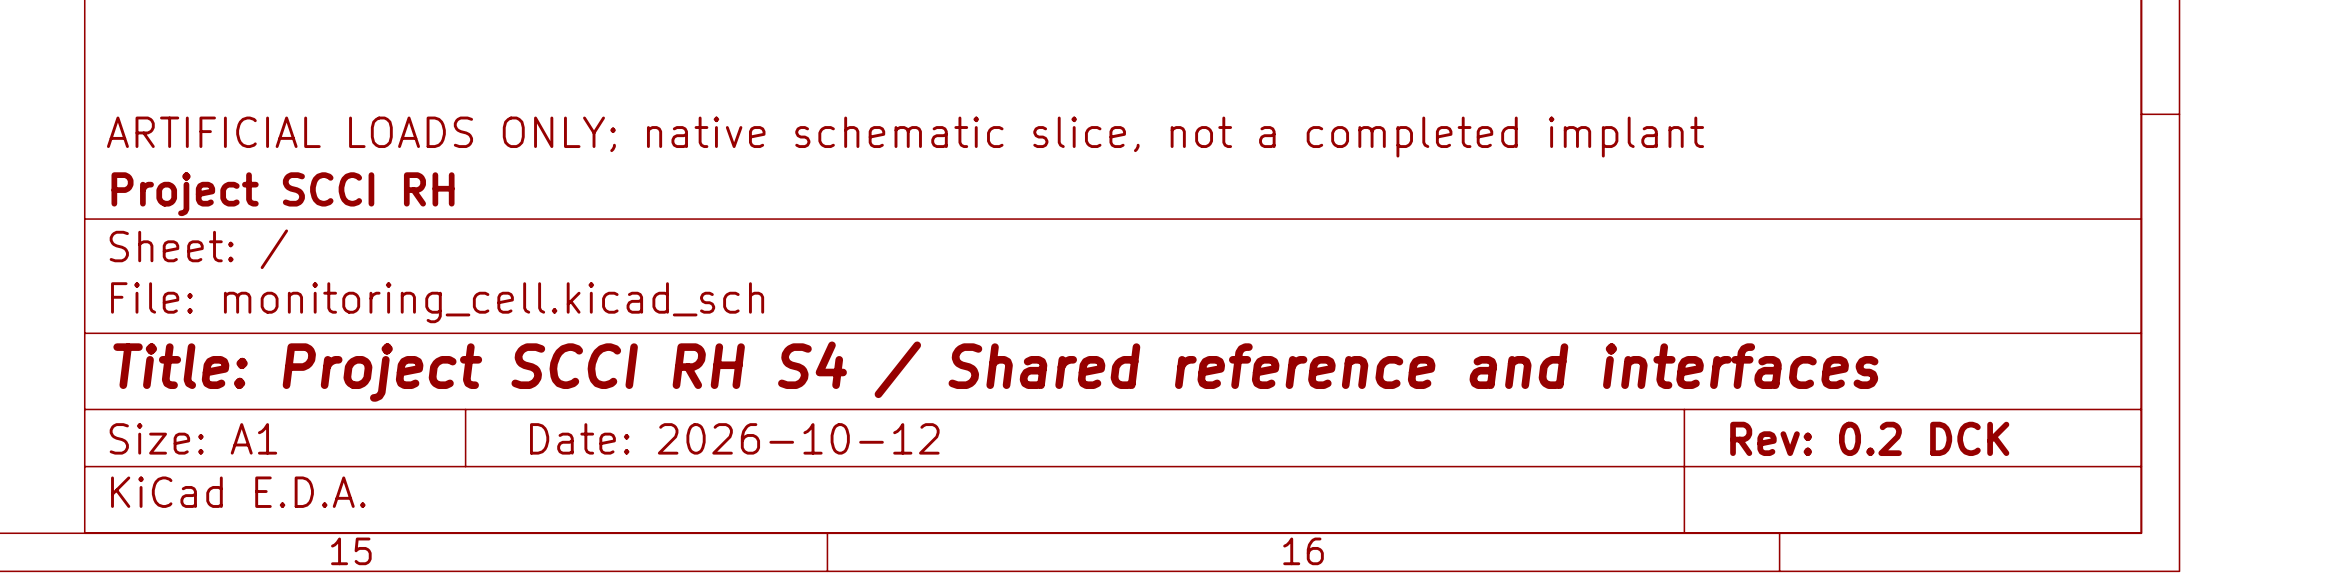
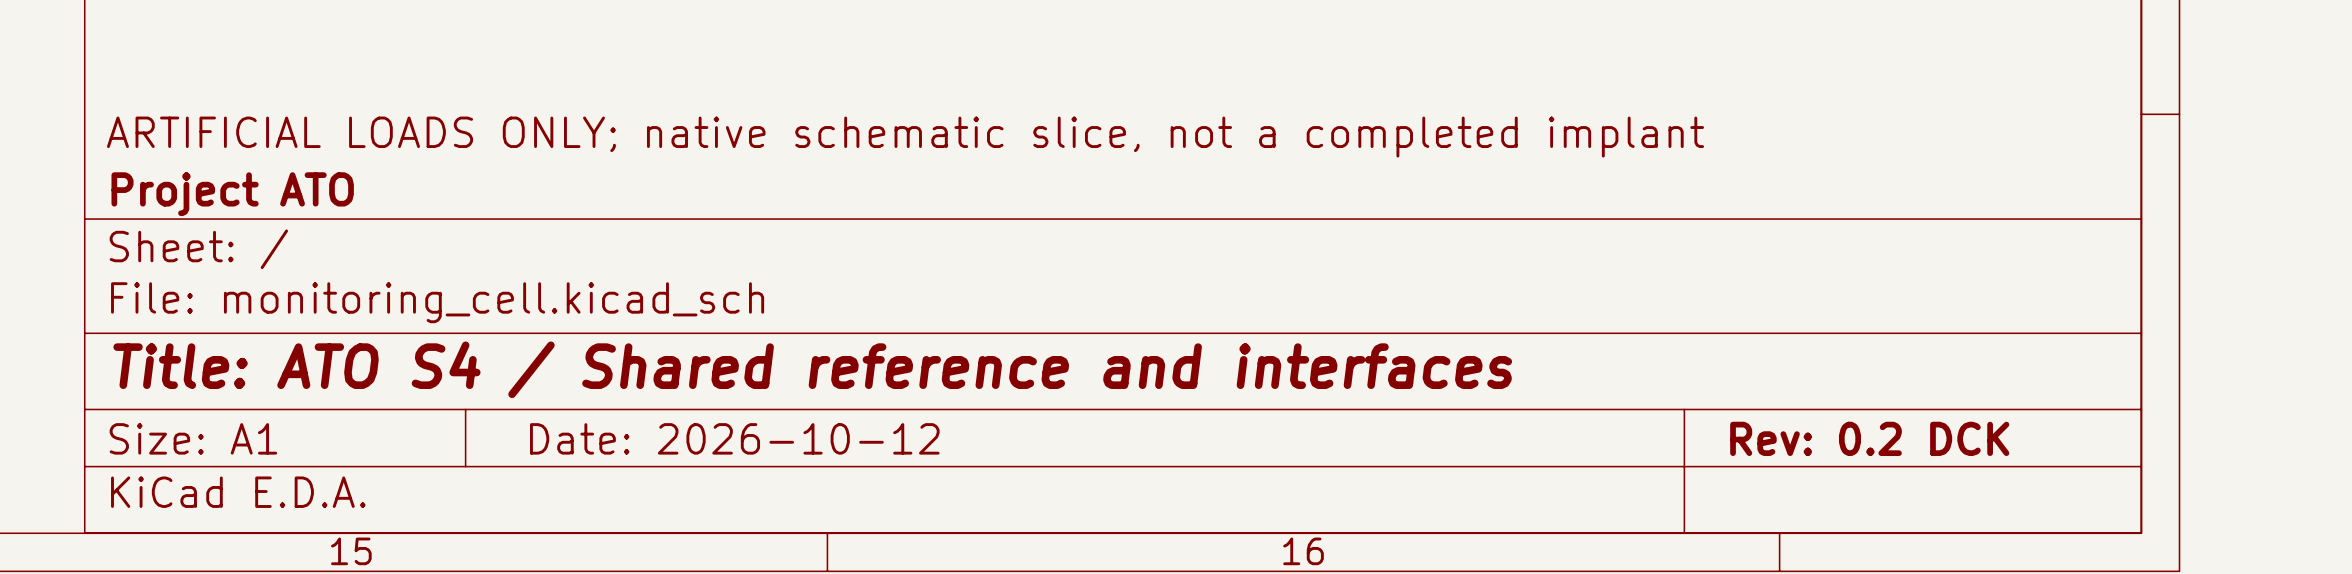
title block: Project SCCI RH (283, 194) -> Project ATO (232, 194)
title block: Title: Project SCCI RH S4 / Shared reference and interfaces (995, 371) -> Title: ATO S4 / Shared reference and interfaces (812, 369)

